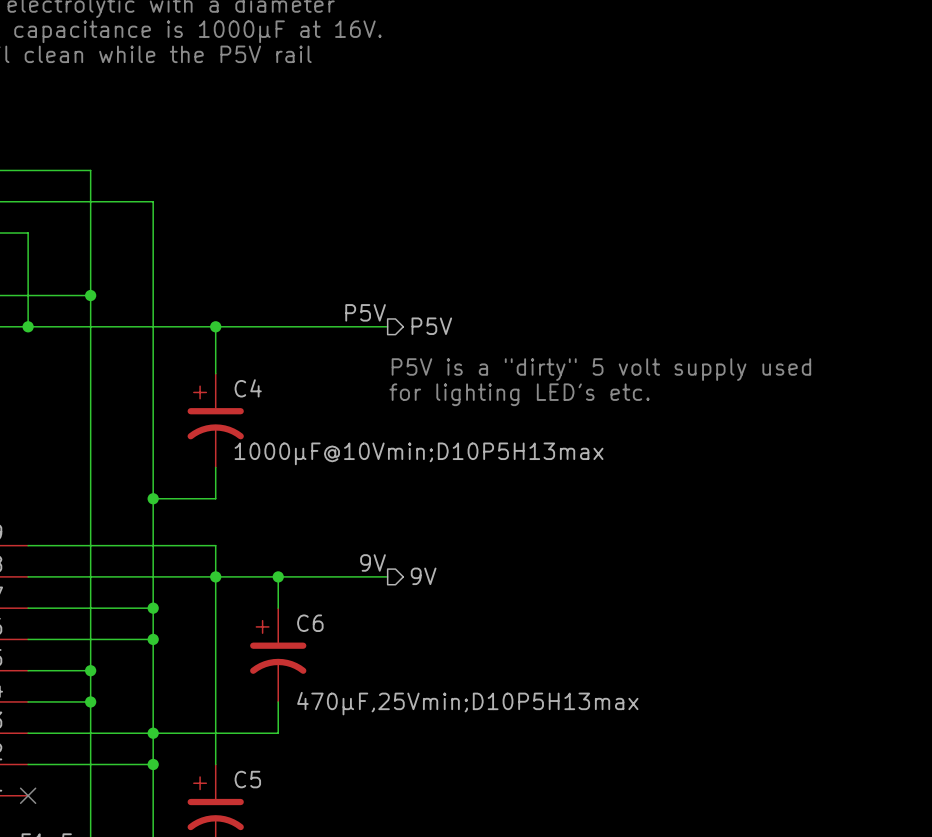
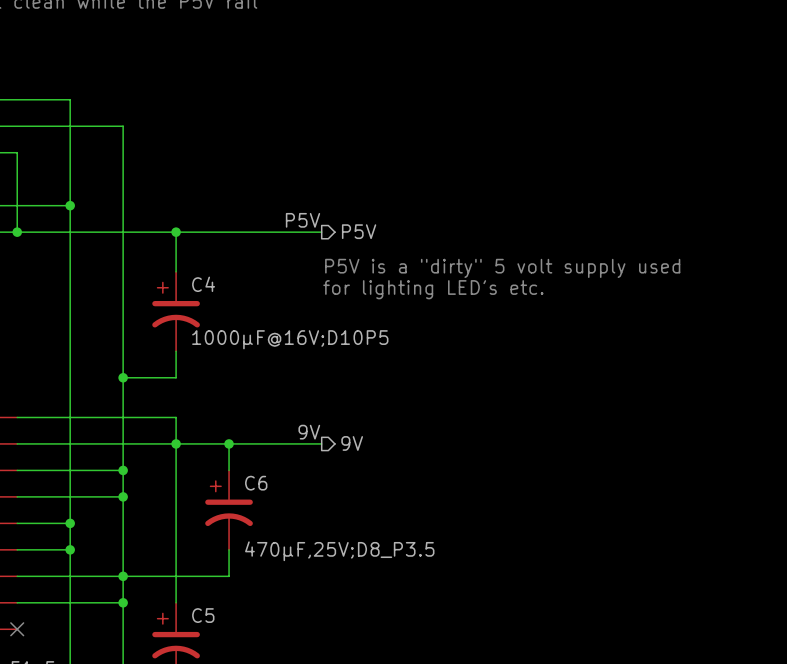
C4 value: 1000µF@10Vmin;D10P5H13max (419, 453) -> 1000µF@16V;D10P5 (290, 339)
C6 value: 470µF,25Vmin;D10P5H13max (467, 703) -> 470µF,25V;D8_P3.5 (339, 551)

